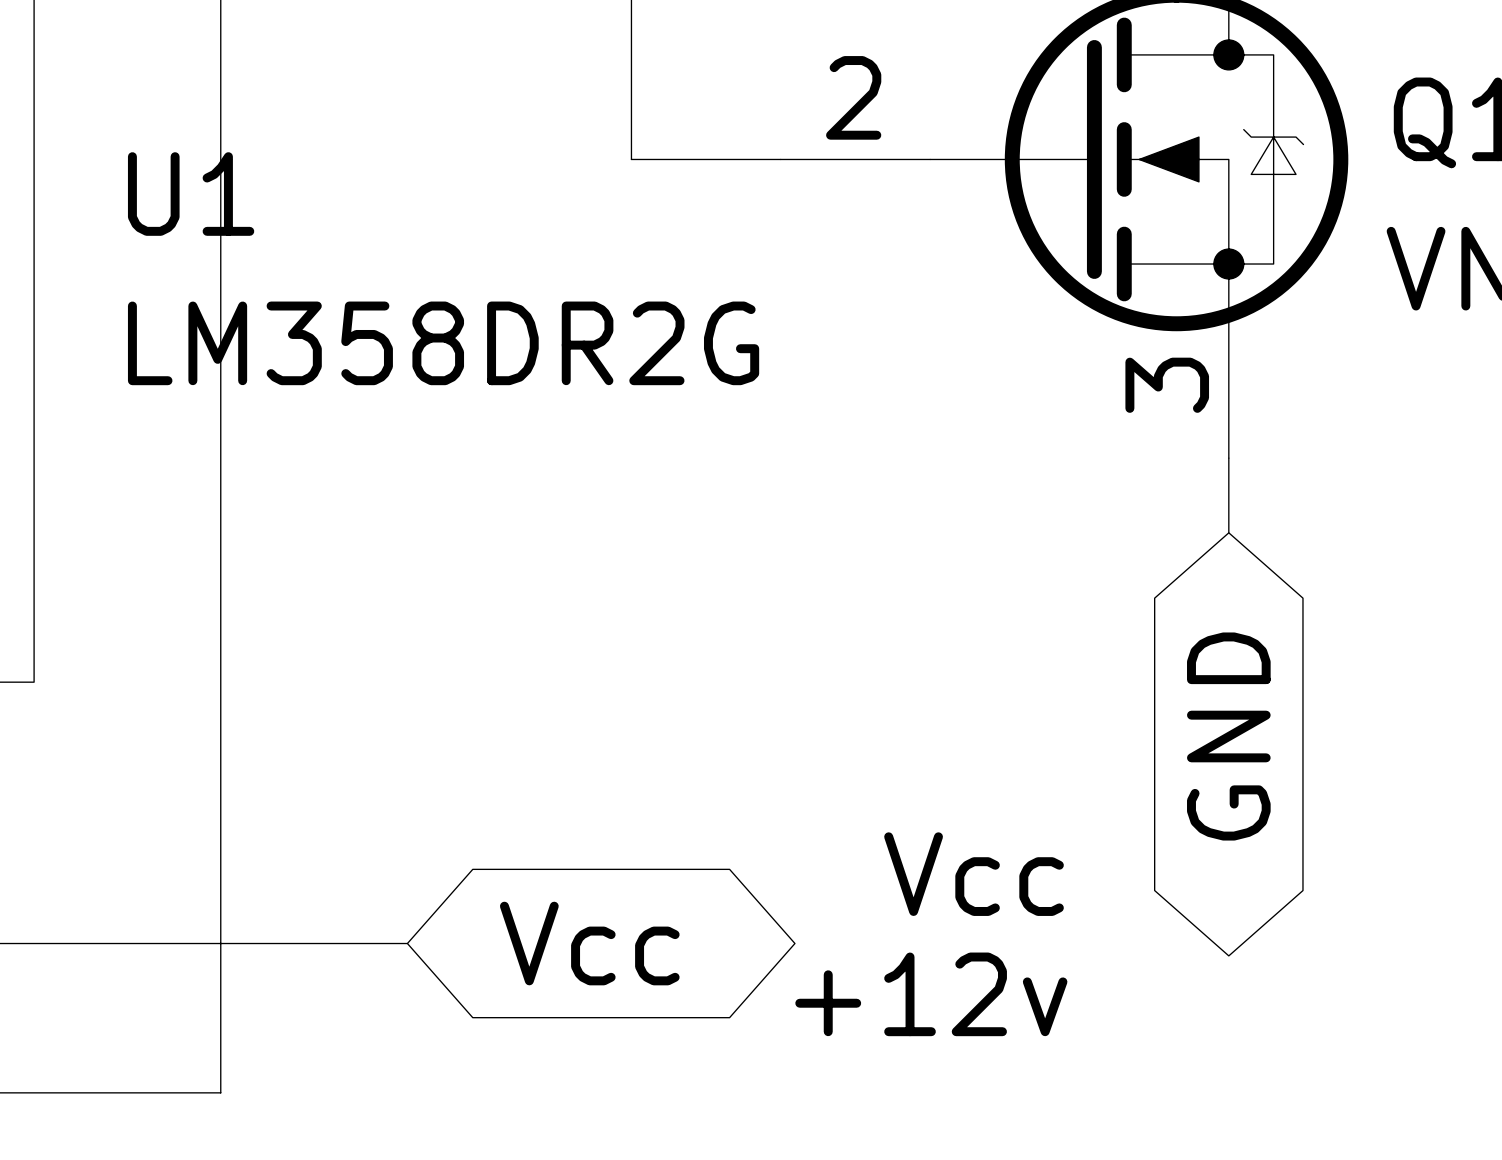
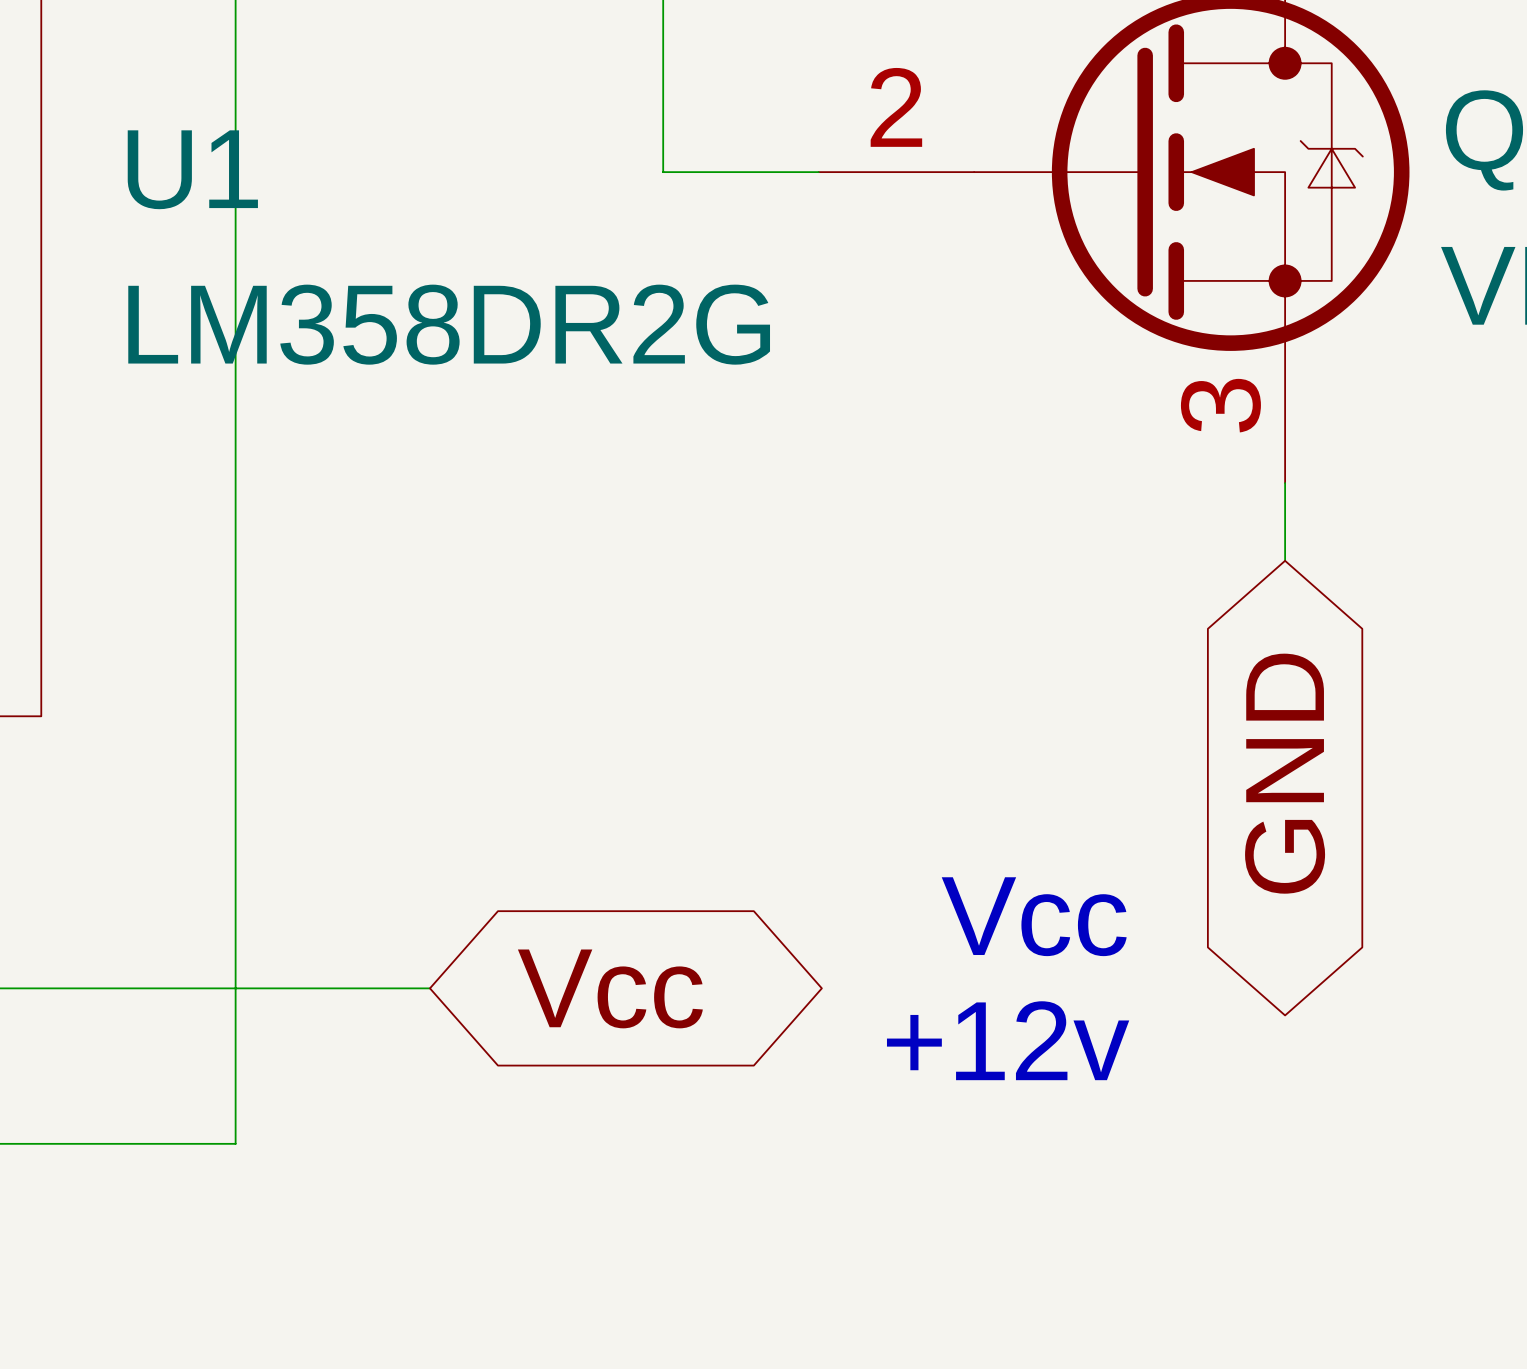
U1 name position: U1 (191, 194) -> U1 (192, 169)
U1 value position: LM358DR2G (443, 343) -> LM358DR2G (449, 324)

